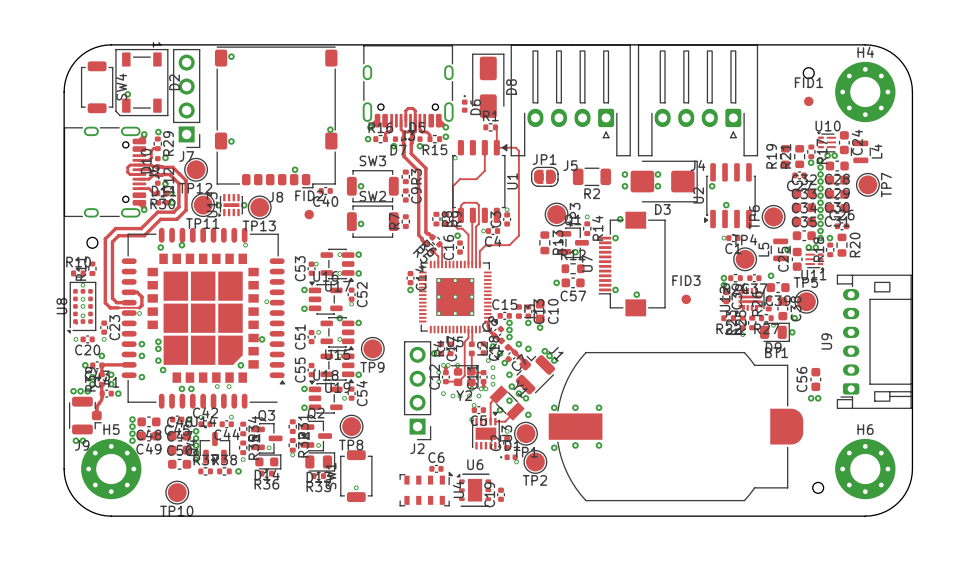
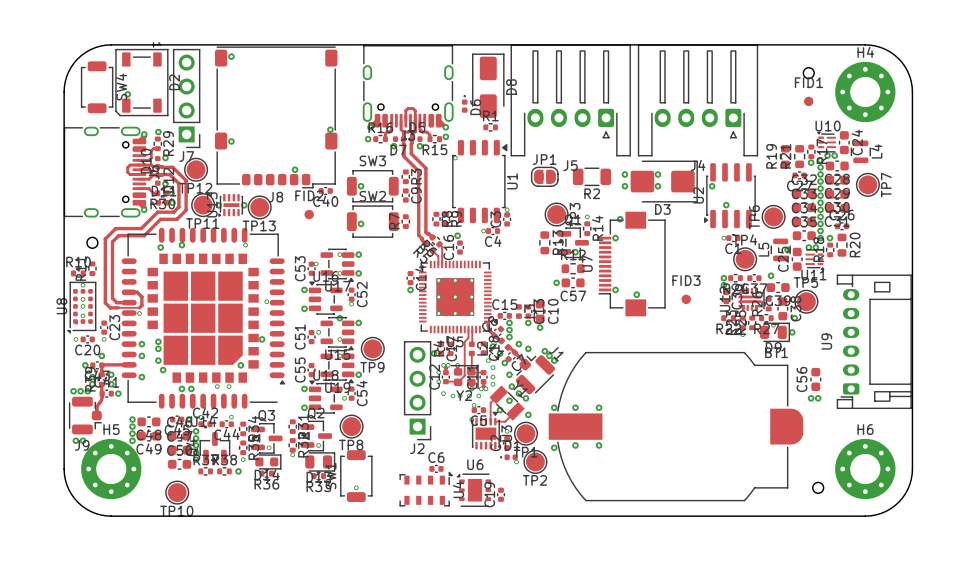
top track: (495, 127) (496, 147) (515, 147) (518, 150) (518, 235) (509, 245) (485, 245) (479, 251) (479, 264) -> none
top track: (484, 147) (484, 170) (476, 179) (460, 179) (452, 186) (452, 223) (457, 228) (462, 228) (468, 234) (468, 264) -> none
top track: (460, 215) (460, 205) (463, 202) (476, 202) (478, 205) (478, 223) (476, 226) (476, 264) -> none
top track: (472, 215) (472, 264) -> none

